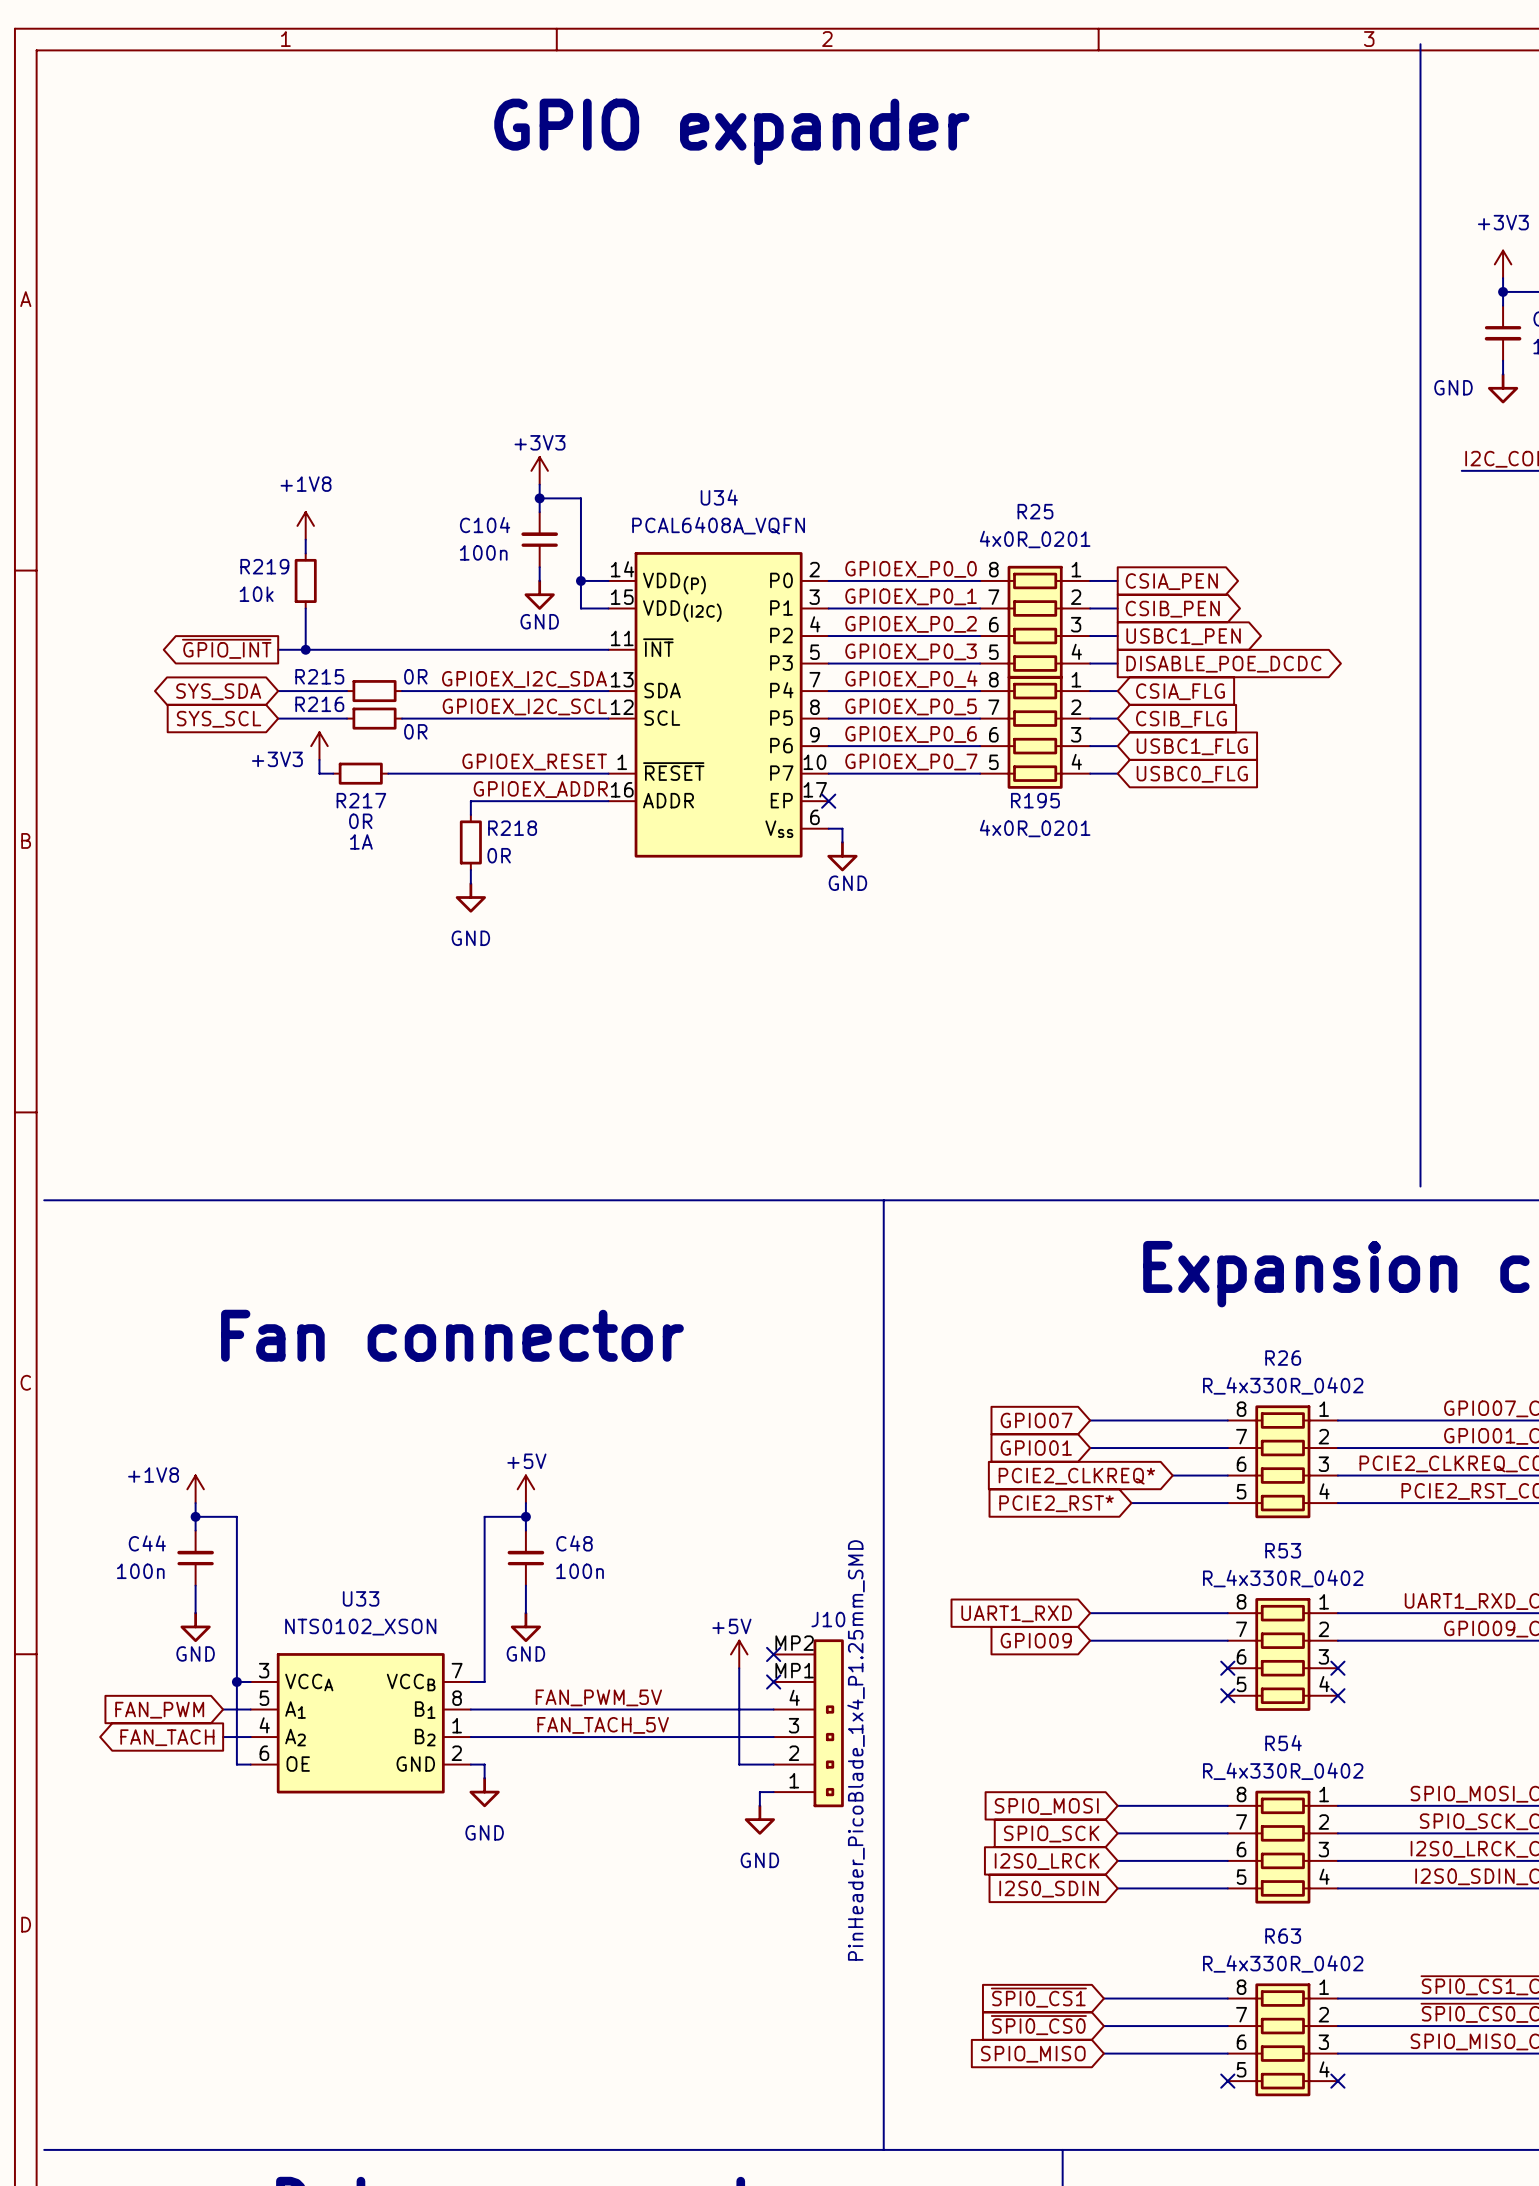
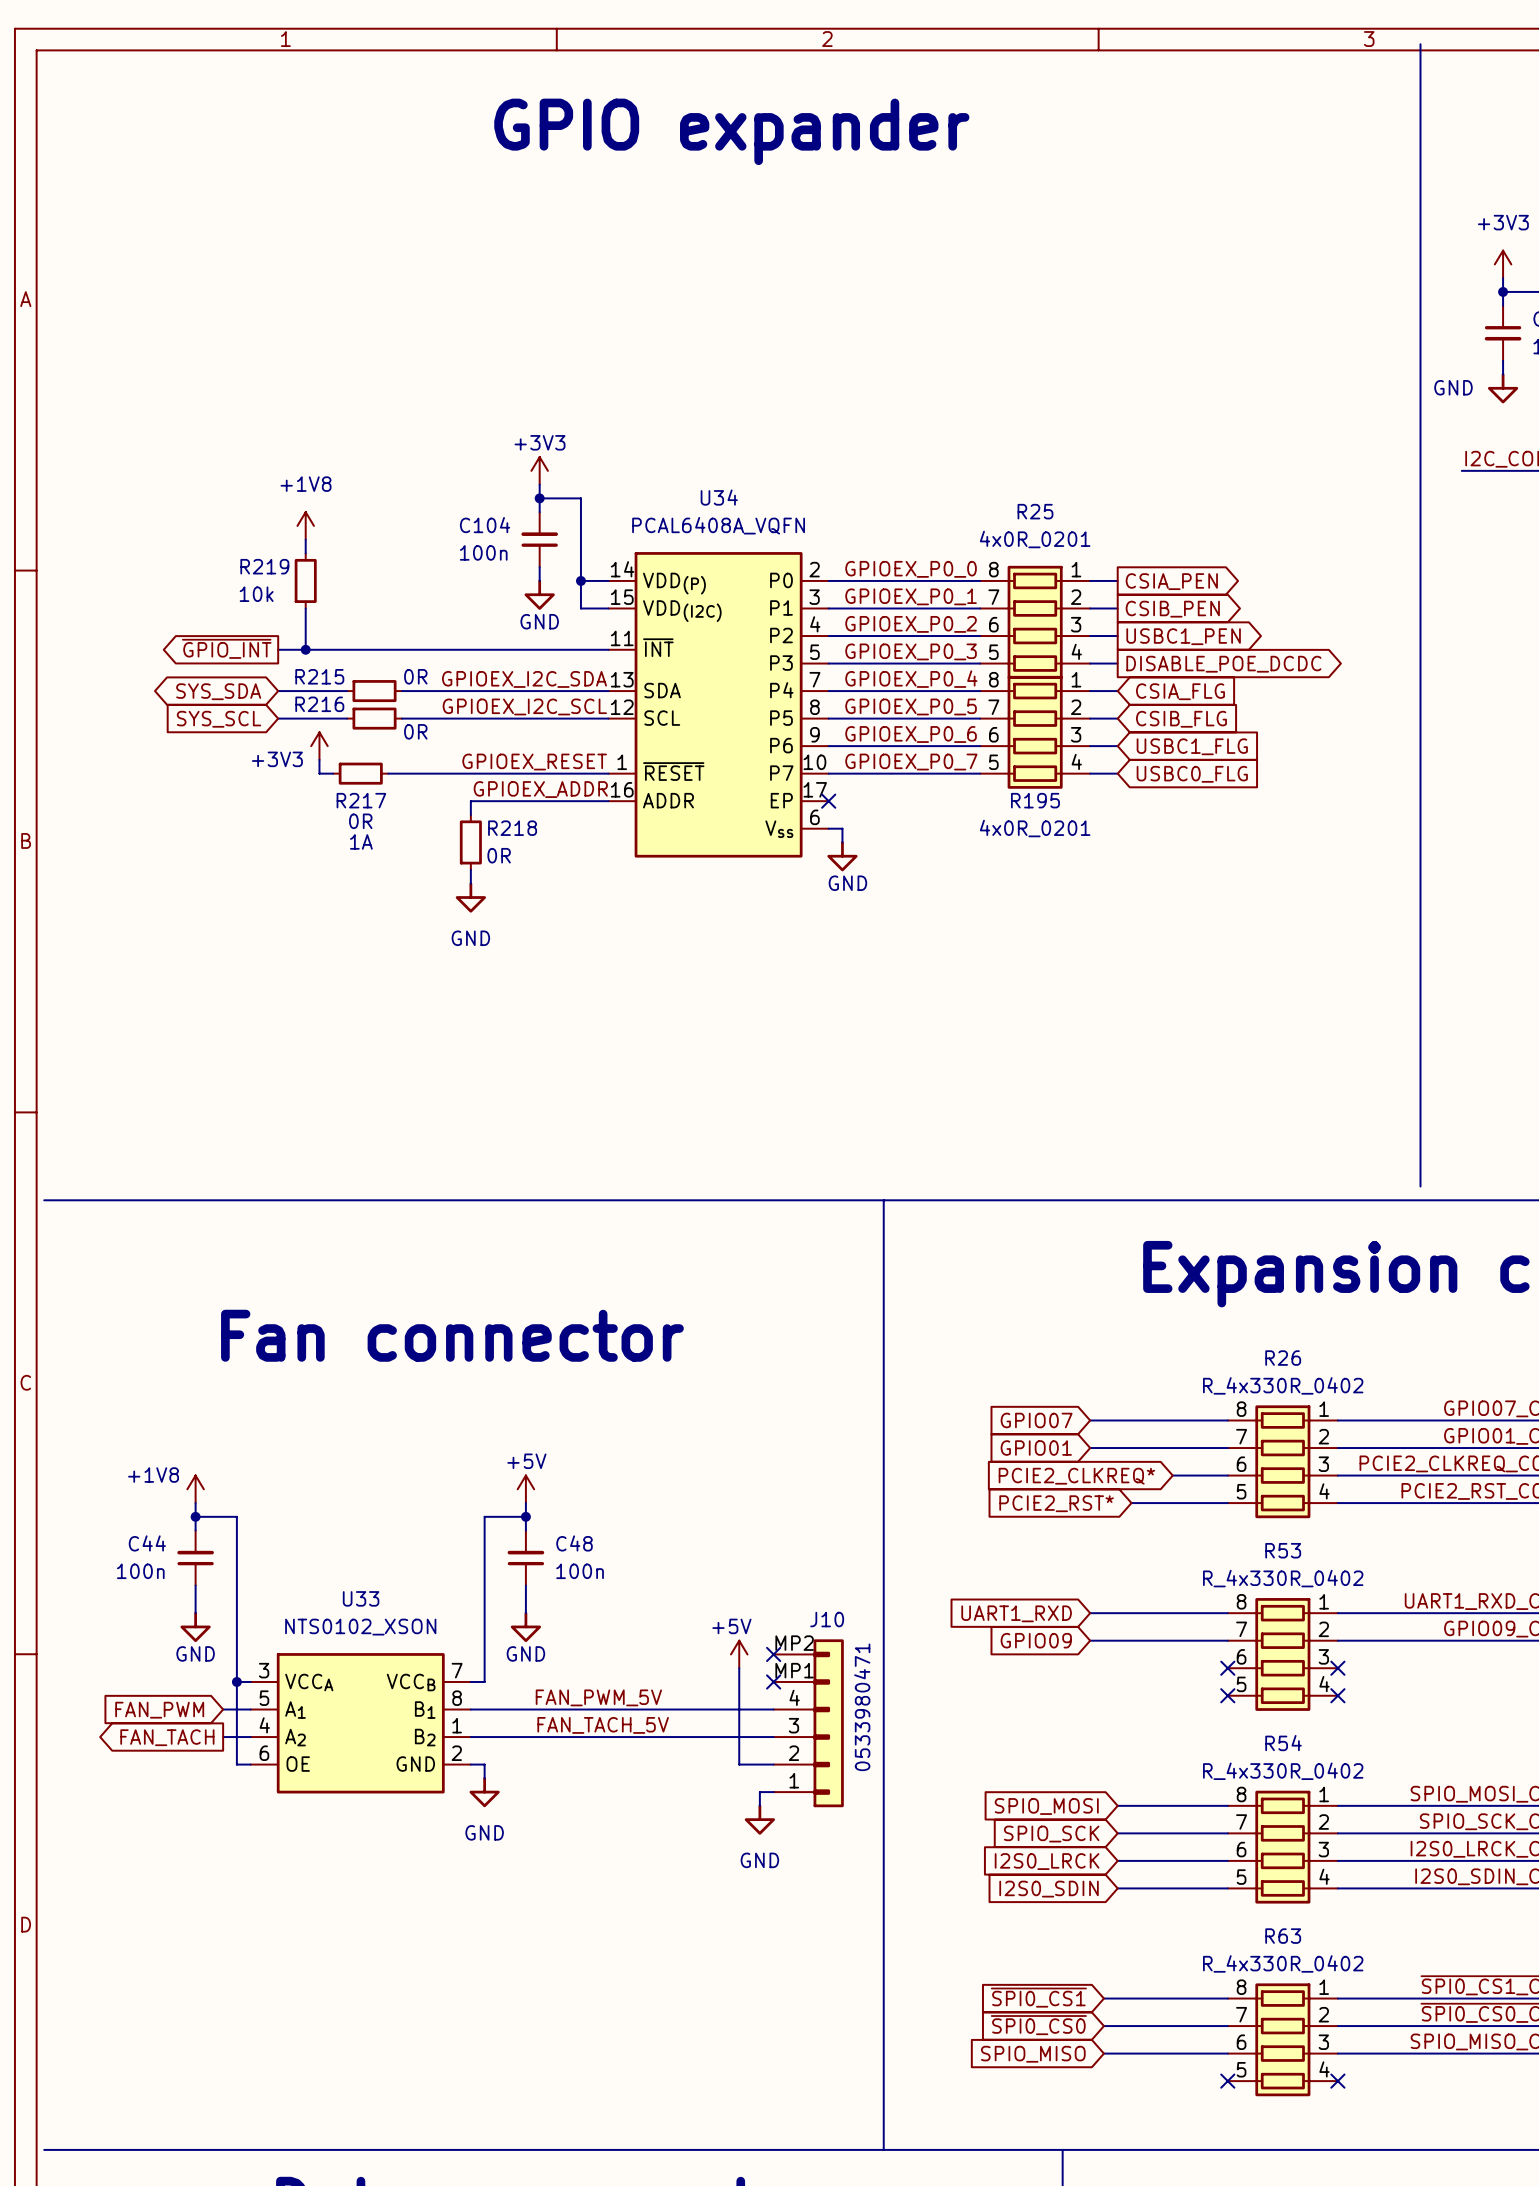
J10 symbol: [773, 1639, 844, 1808] -> [773, 1639, 844, 1808]
J10 text: none -> 0533980471 (862, 1707)
J10 value: PinHeader_PicoBlade_1x4_P1.25mm_SMD (856, 1750) -> none

